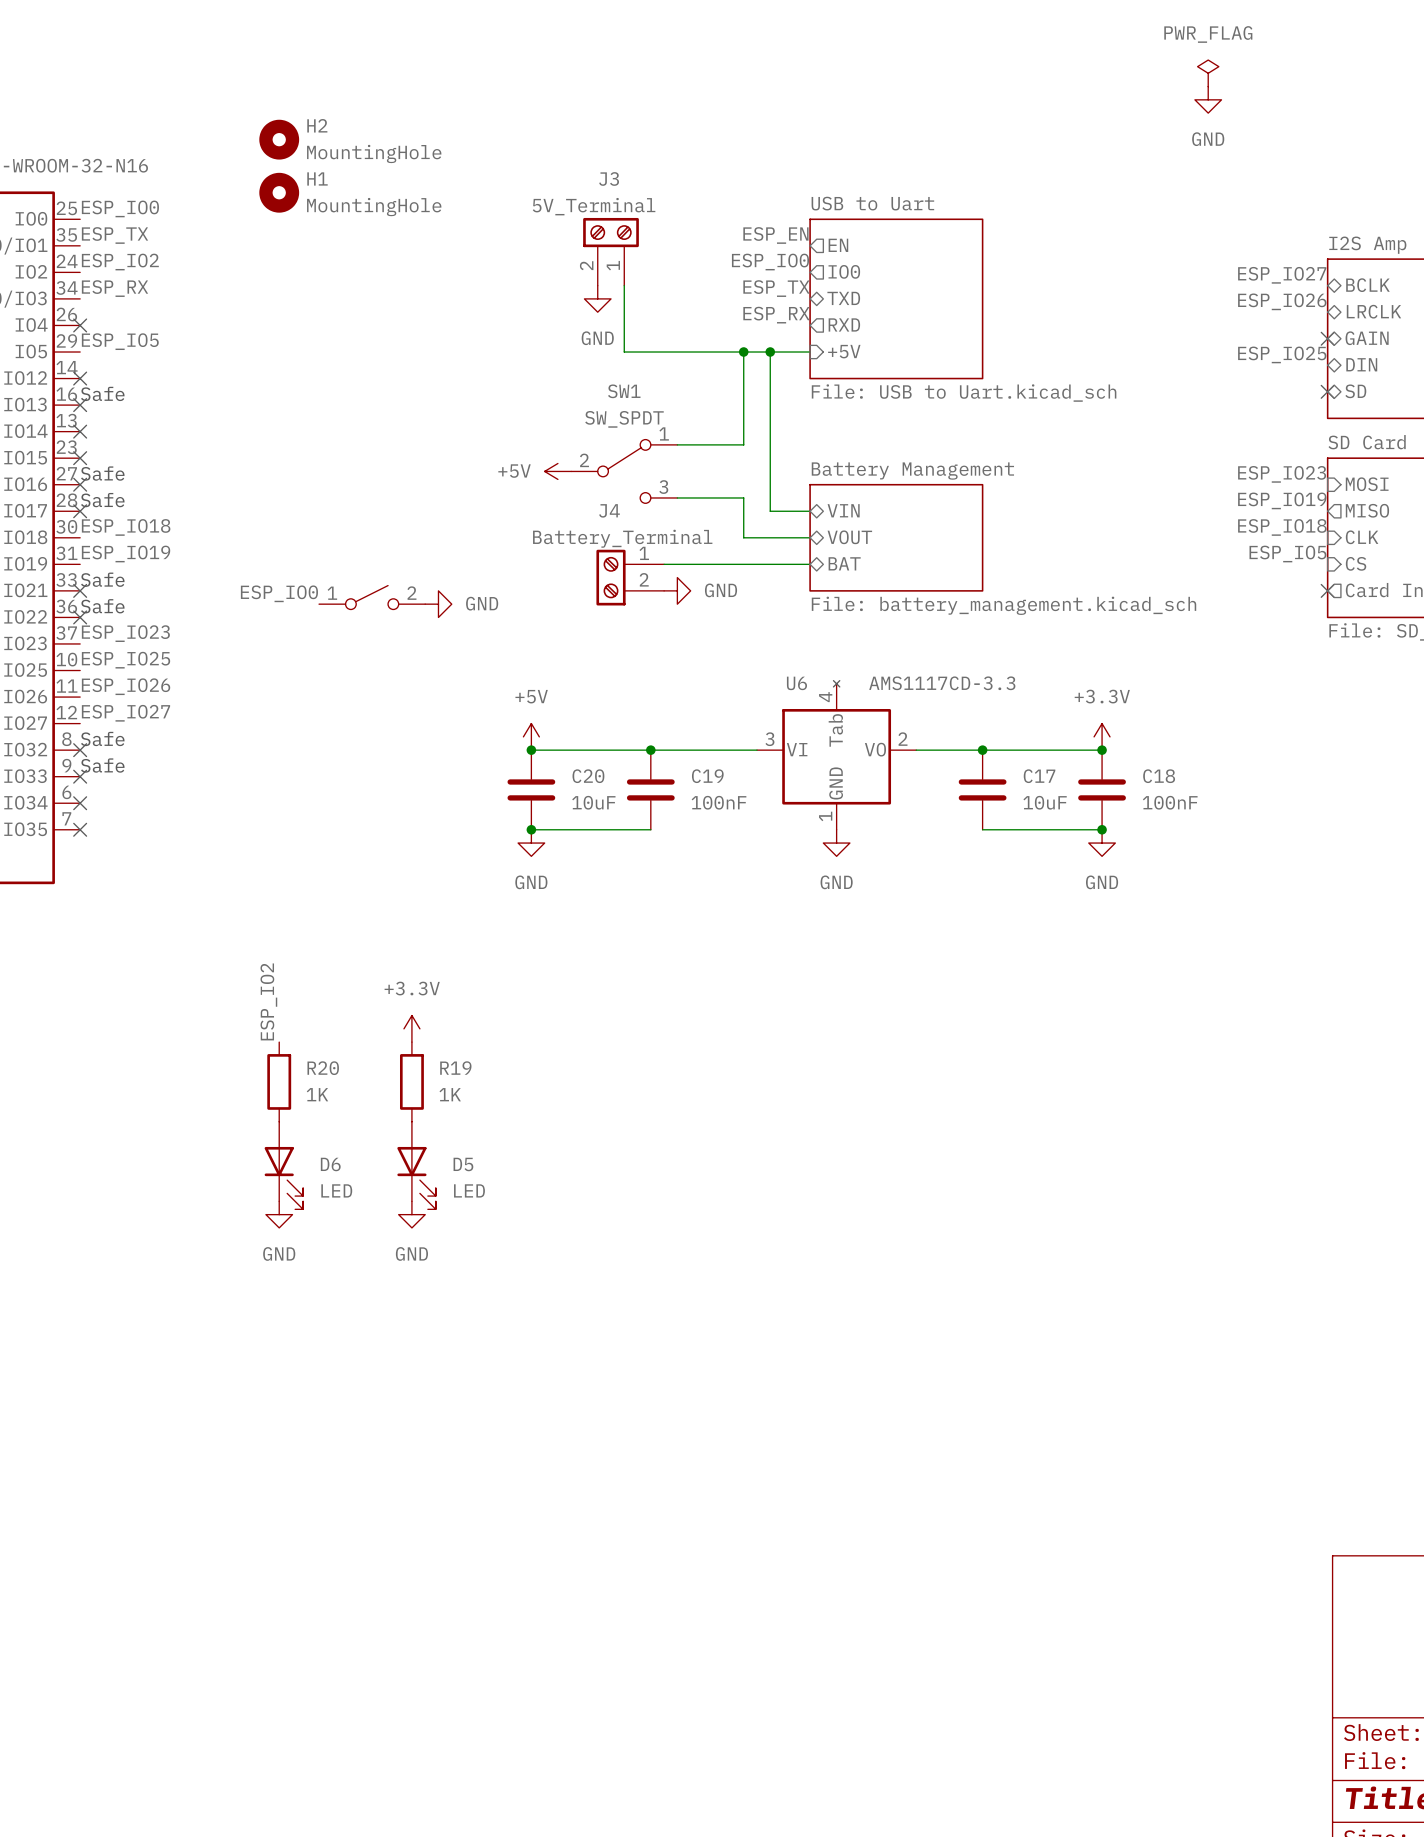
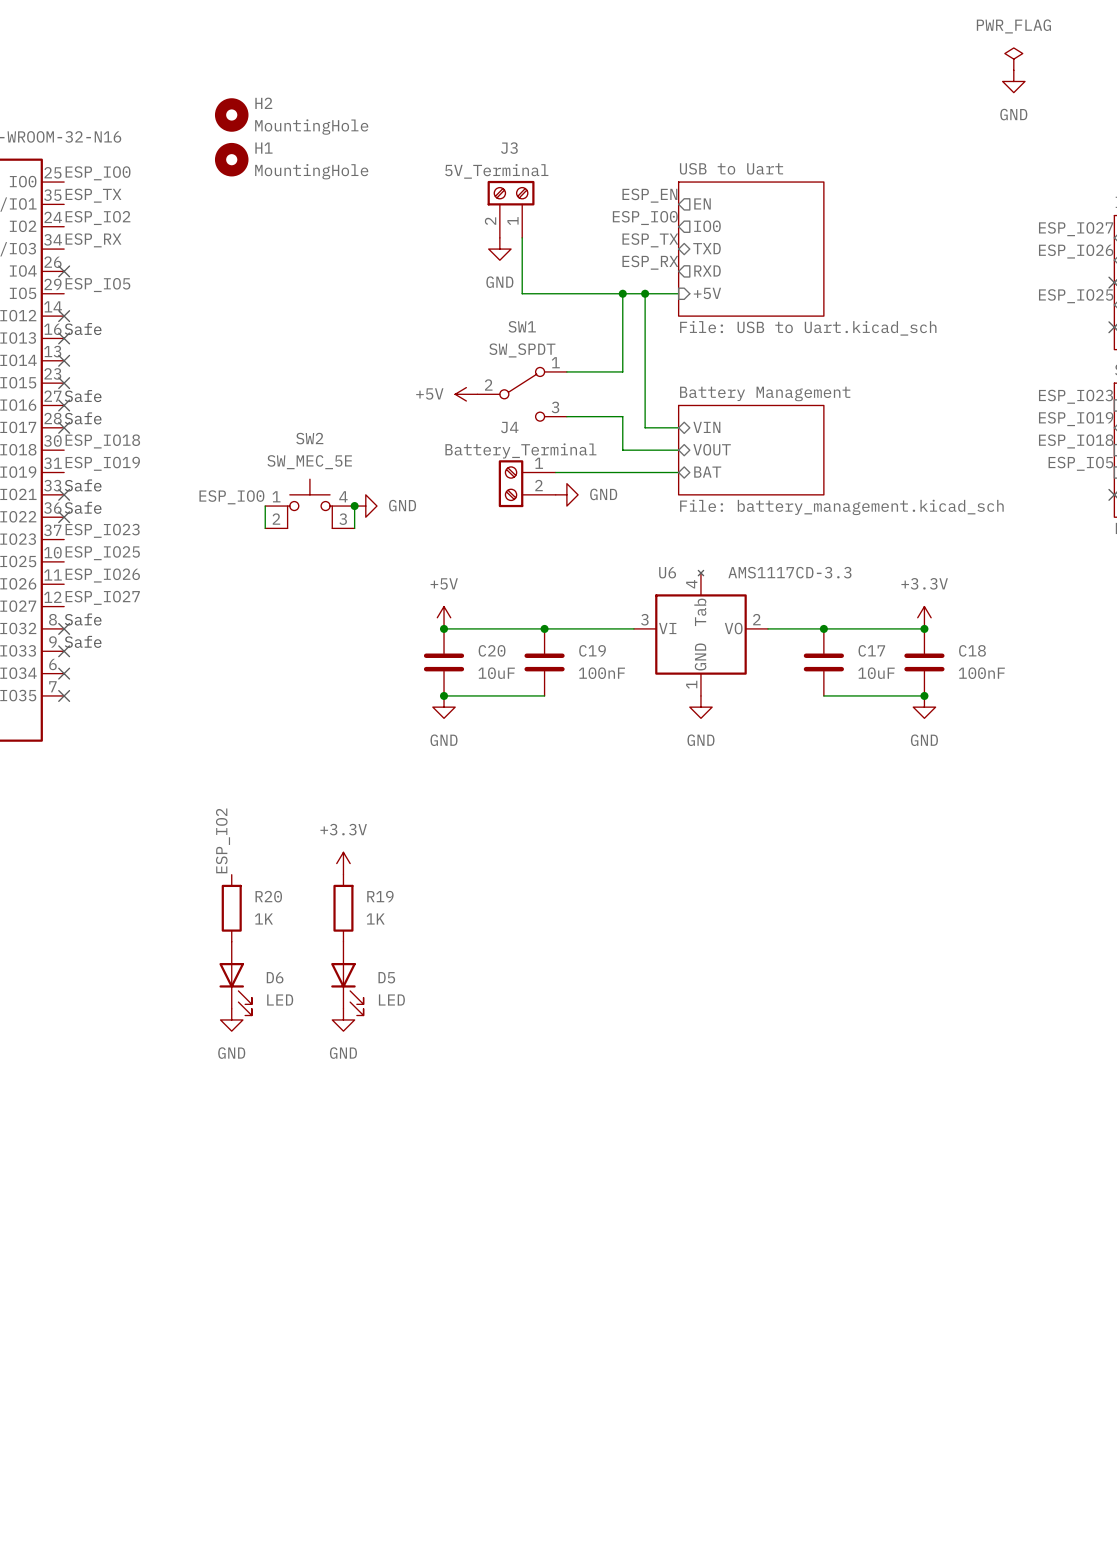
part: (372, 597) -> none
SW2: none -> SW_MEC_5E (309, 503)
wire: none -> (265, 506) (265, 528)
wire: none -> (354, 506) (354, 528)
junction: none -> (354, 506)

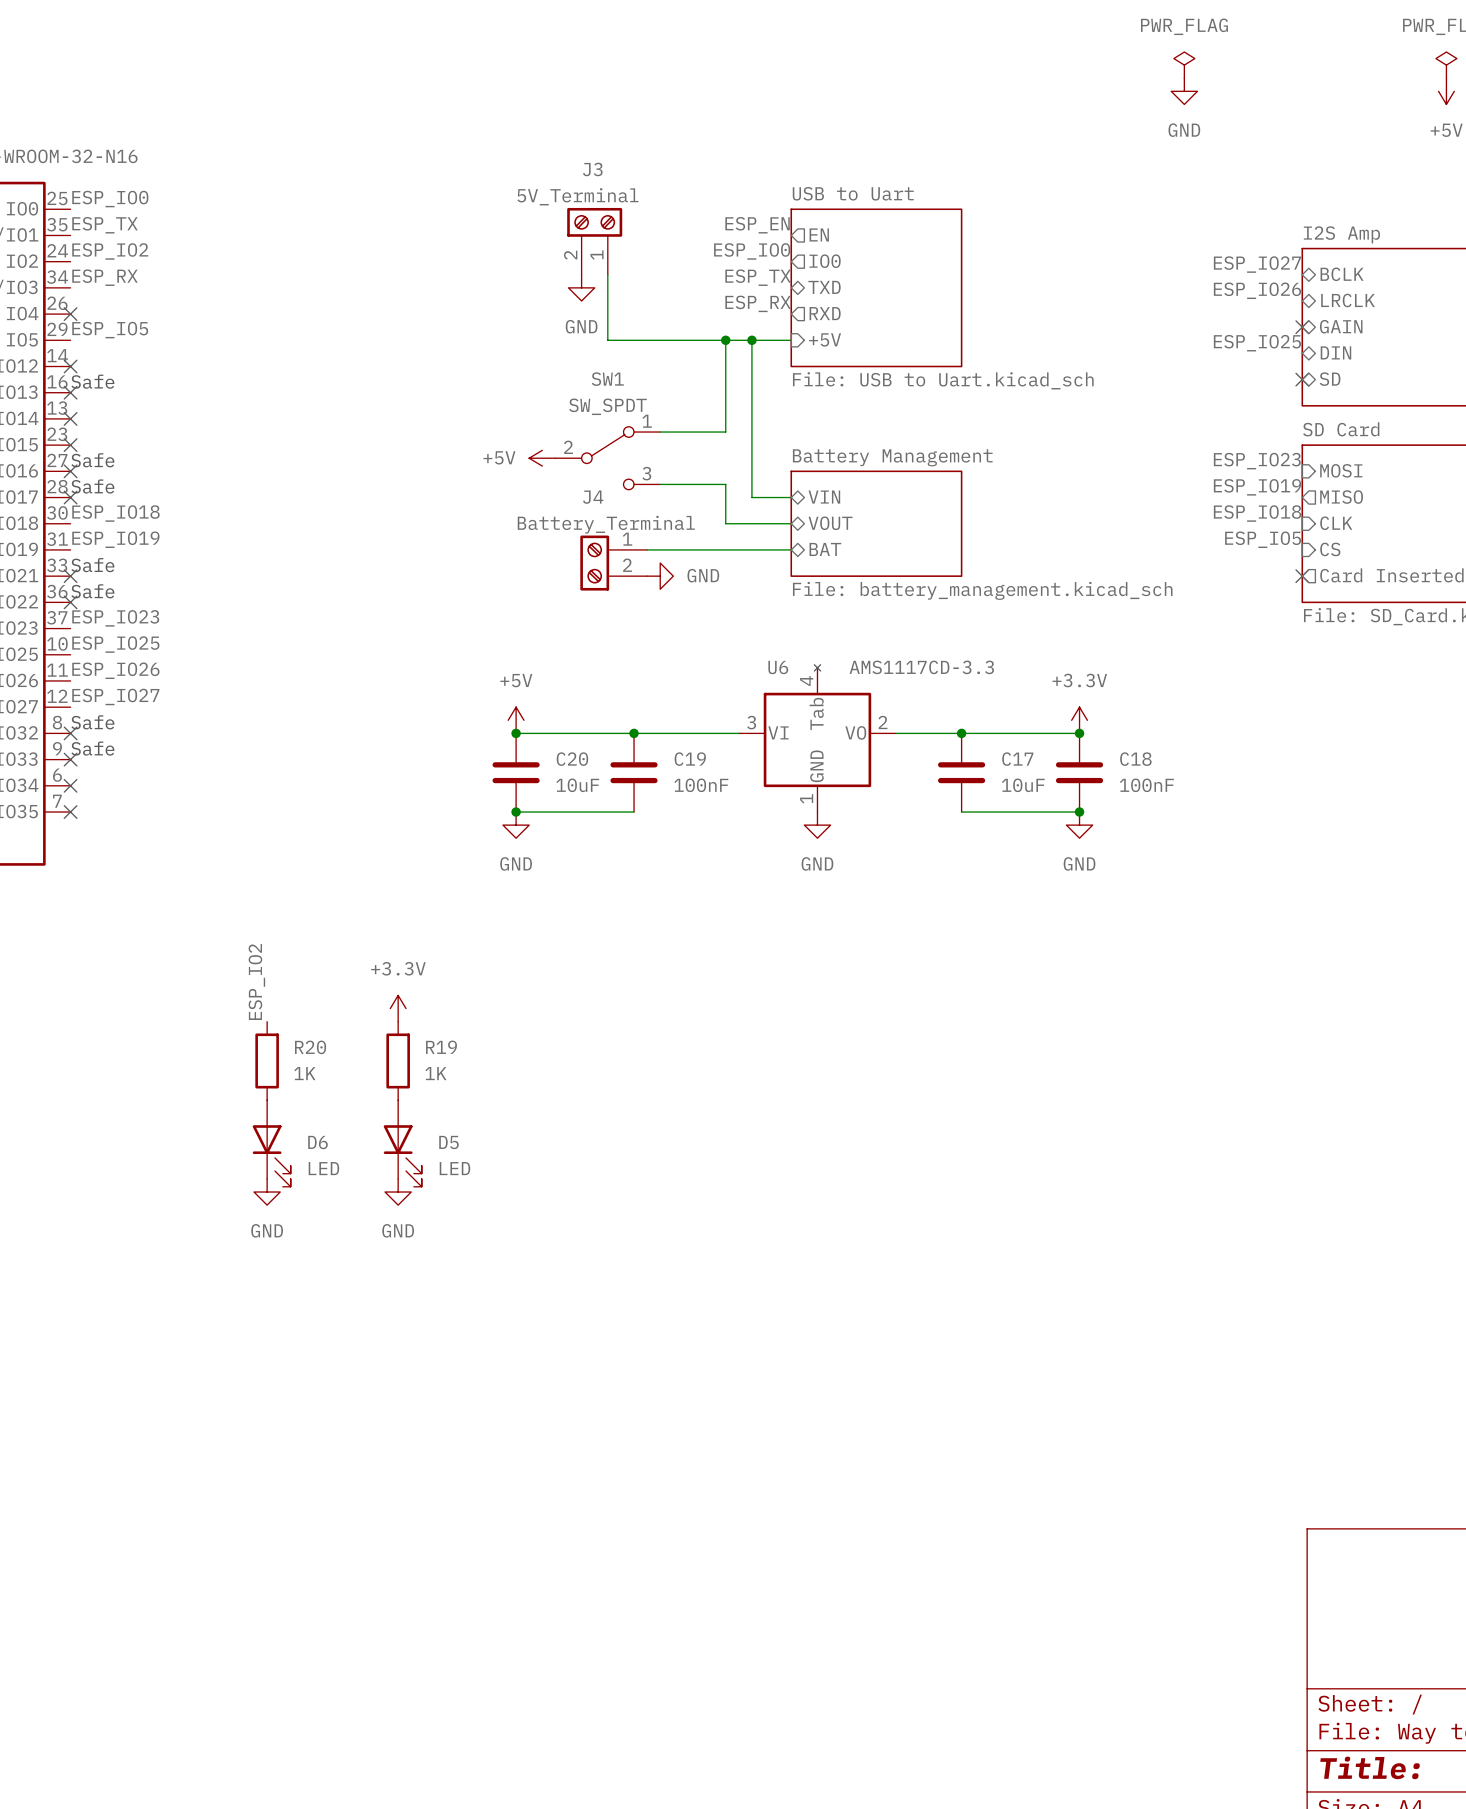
H2: MountingHole (231, 114) -> none
H1: MountingHole (231, 159) -> none
label: ESP_IO0 (231, 497) -> none
SW2: SW_MEC_5E (309, 503) -> none
wire: (265, 506) (265, 528) -> none
wire: (354, 506) (354, 528) -> none
junction: (354, 506) -> none
power symbol: GND (365, 506) -> none

